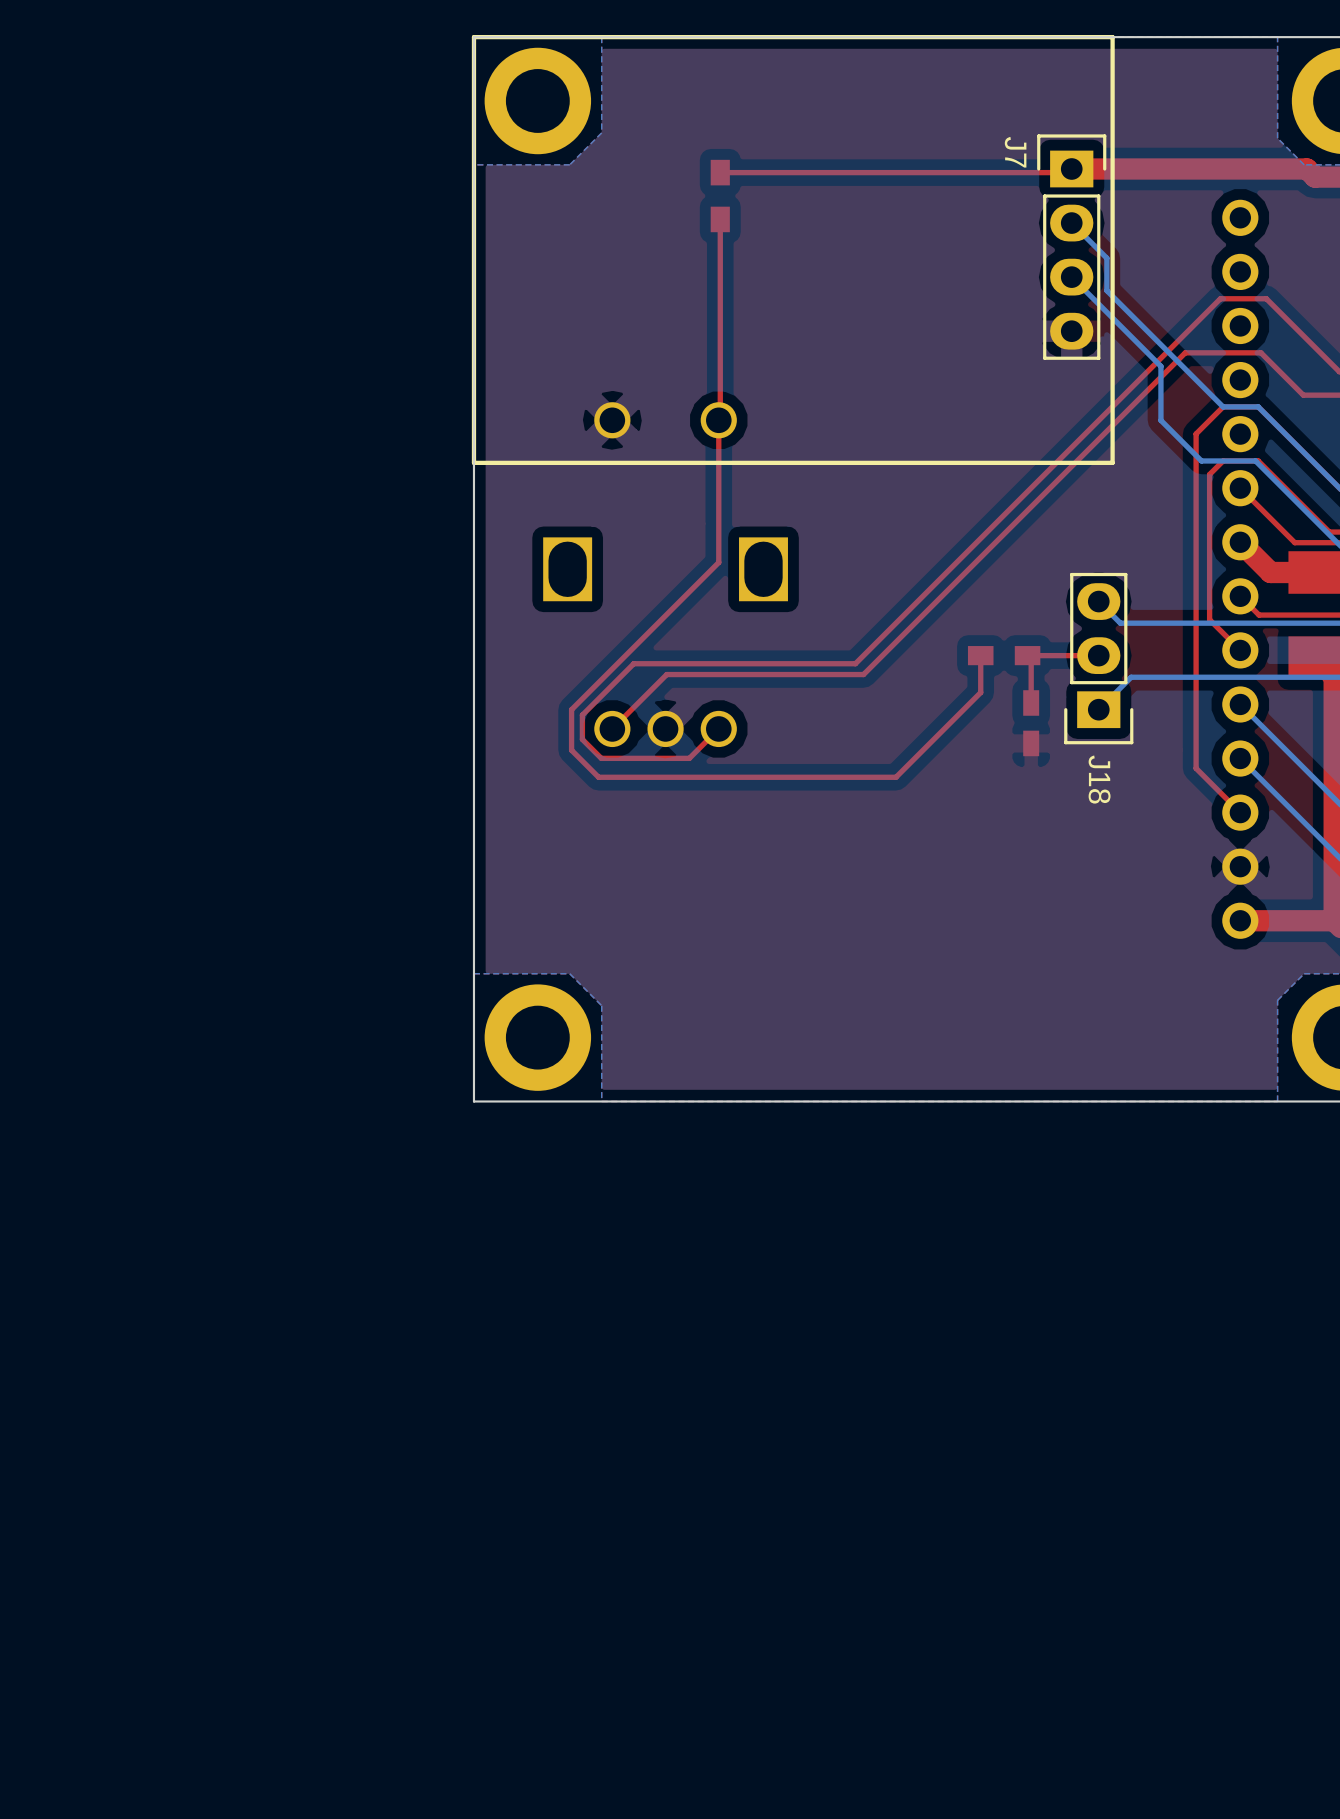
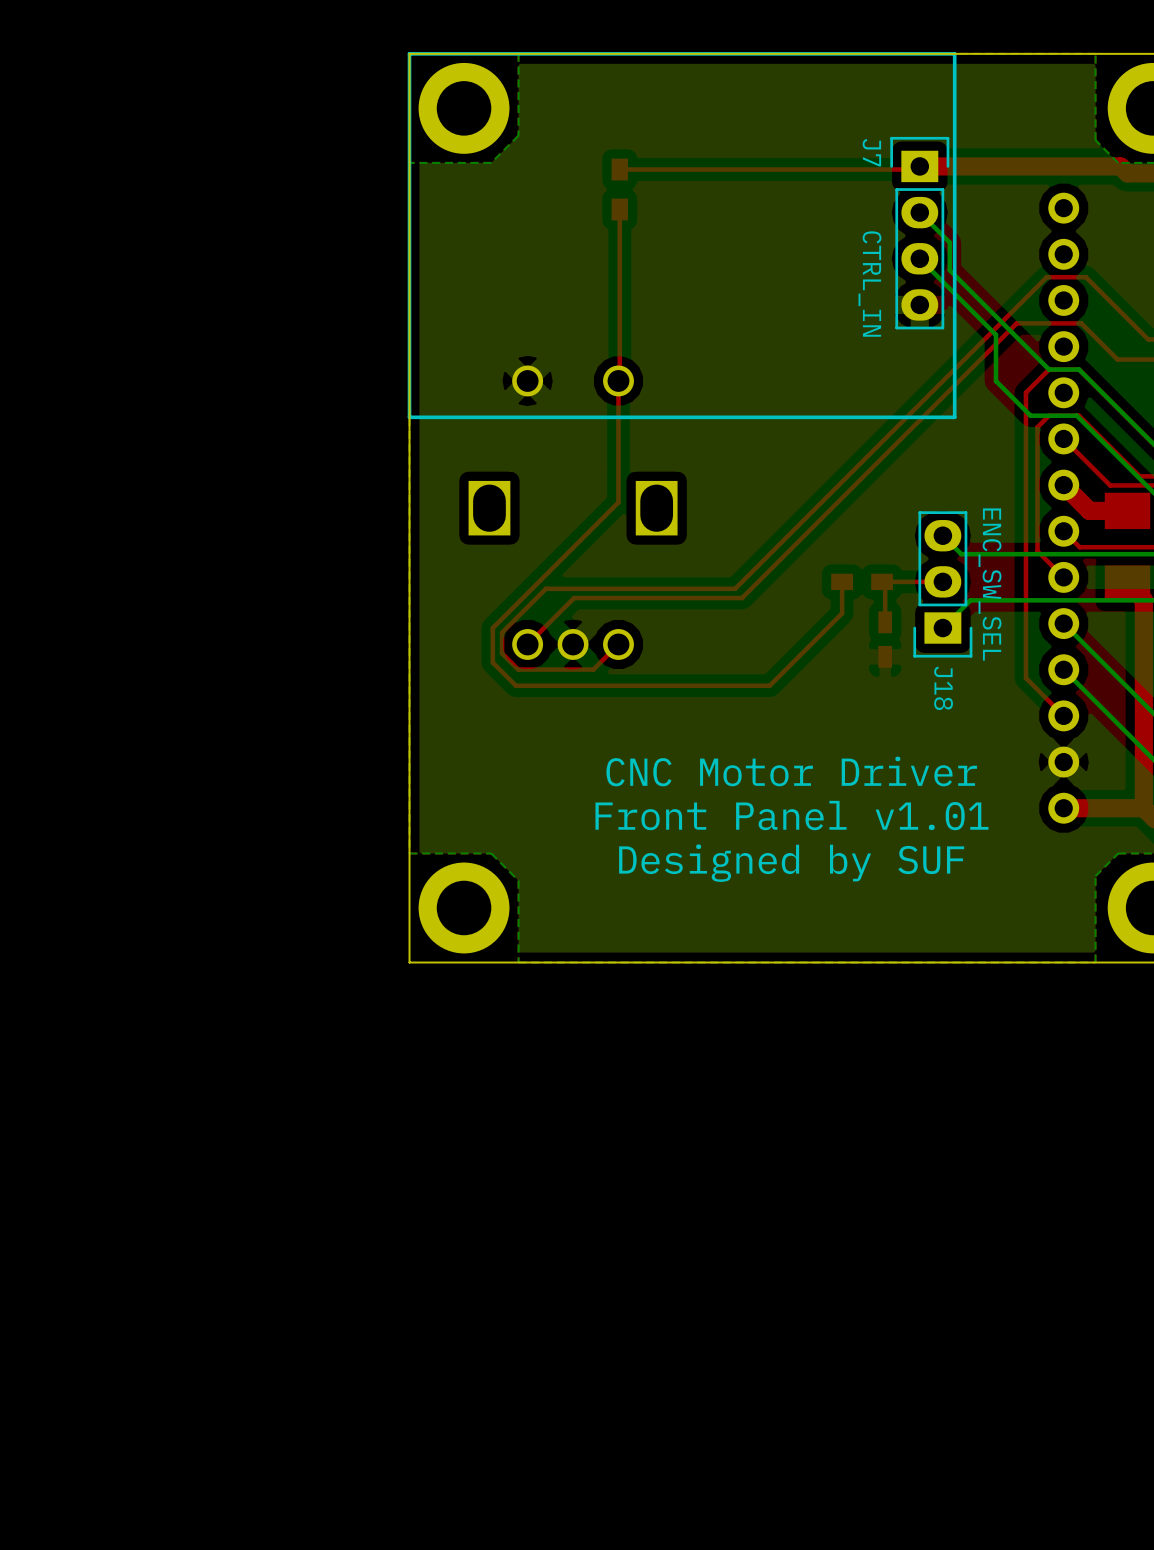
J7 value: none -> CTRL_IN (869, 284)
J18 value: none -> ENC_SW_SEL (989, 584)
text: none -> CNC Motor Driver (791, 771)
text: none -> Front Panel v1.01 (791, 815)
text: none -> Designed by SUF (791, 863)

